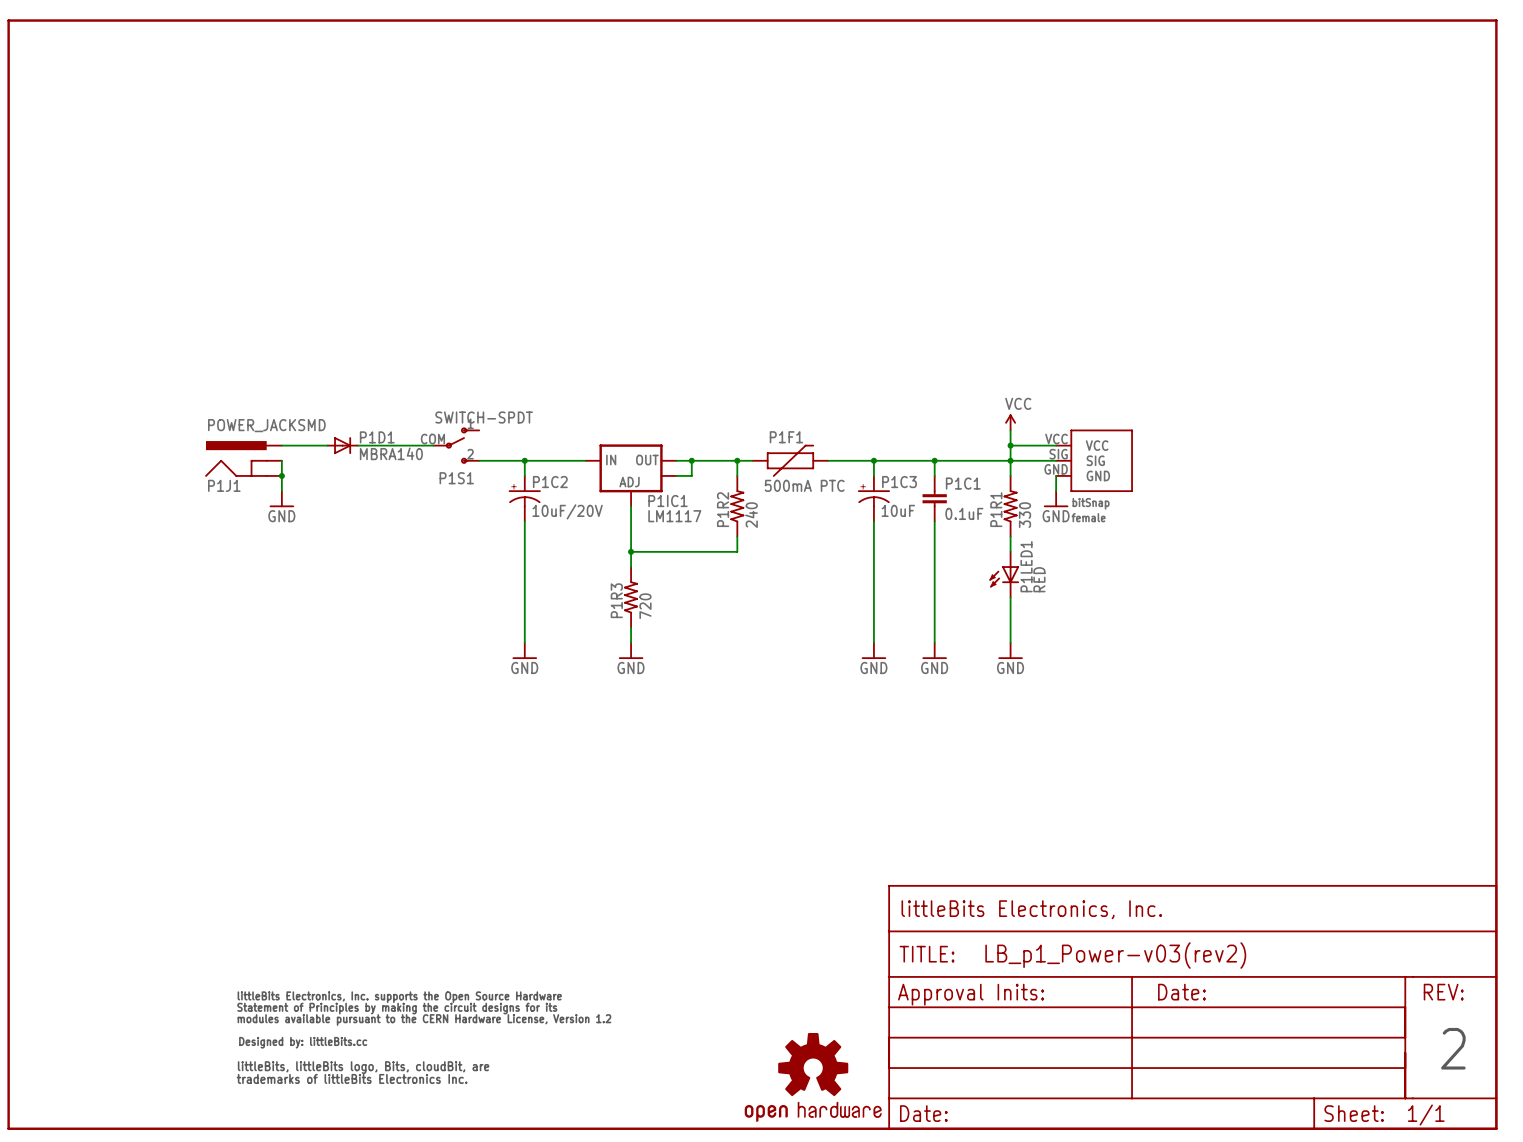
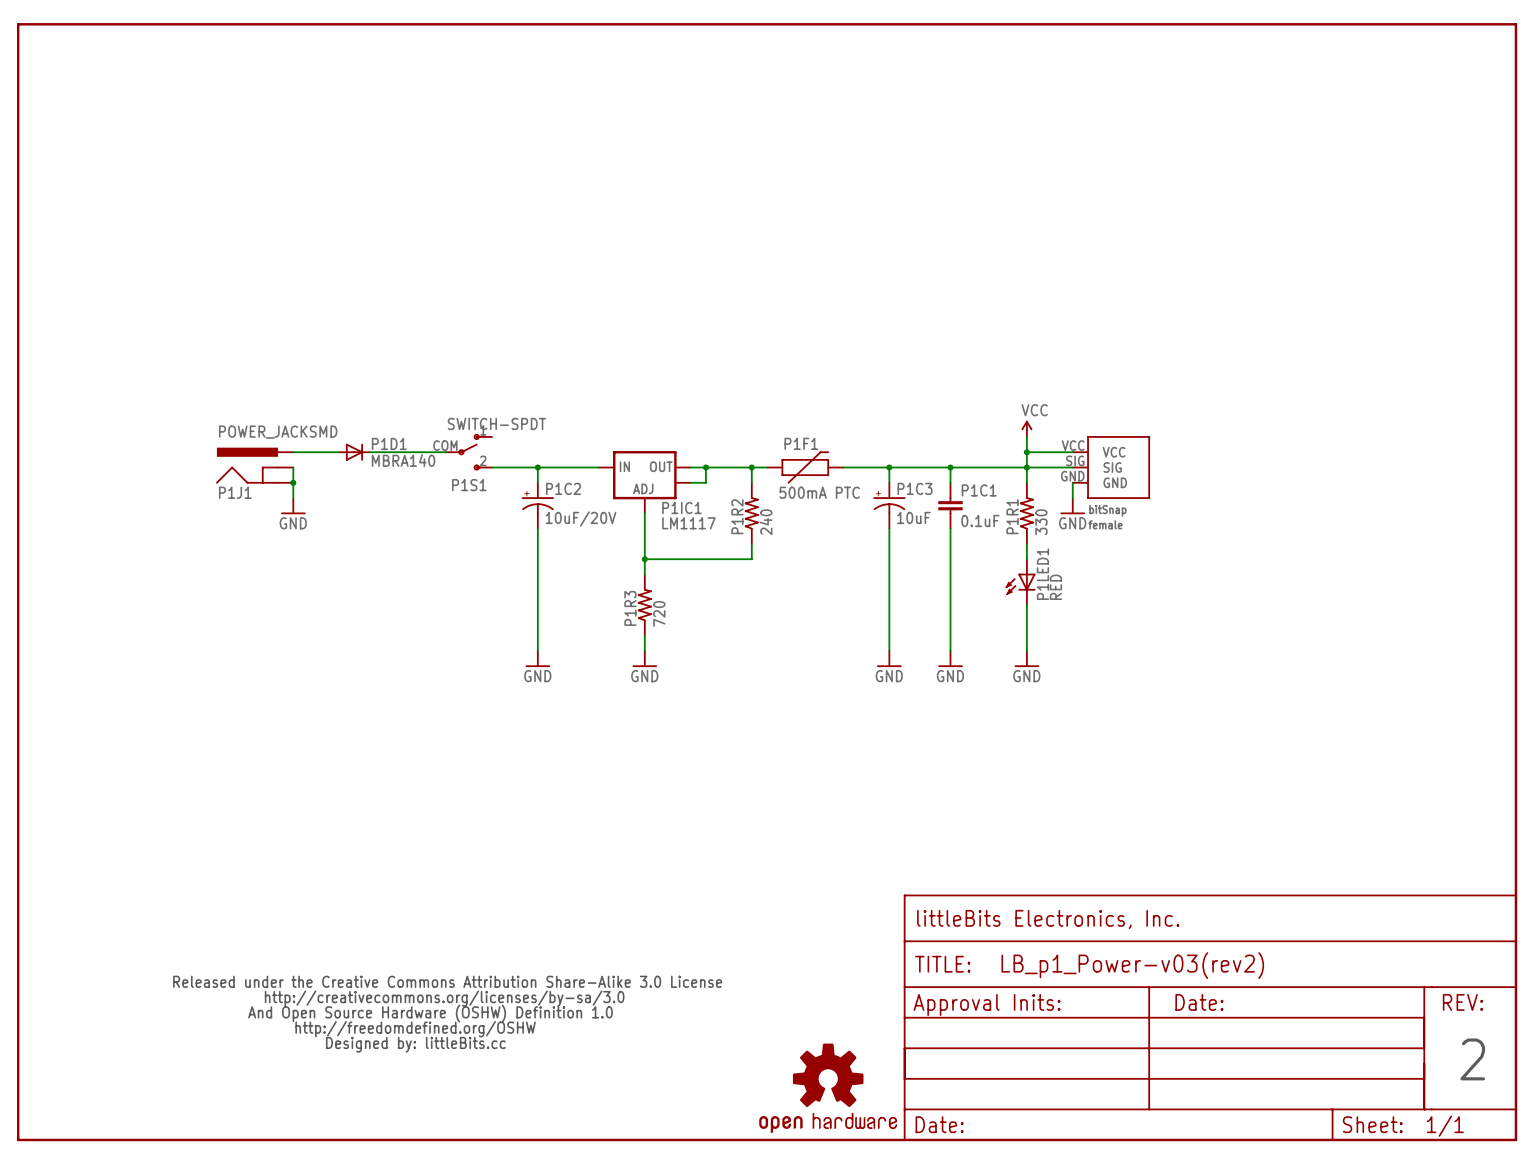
part: none -> (447, 1014)
part: (424, 1037) -> none

